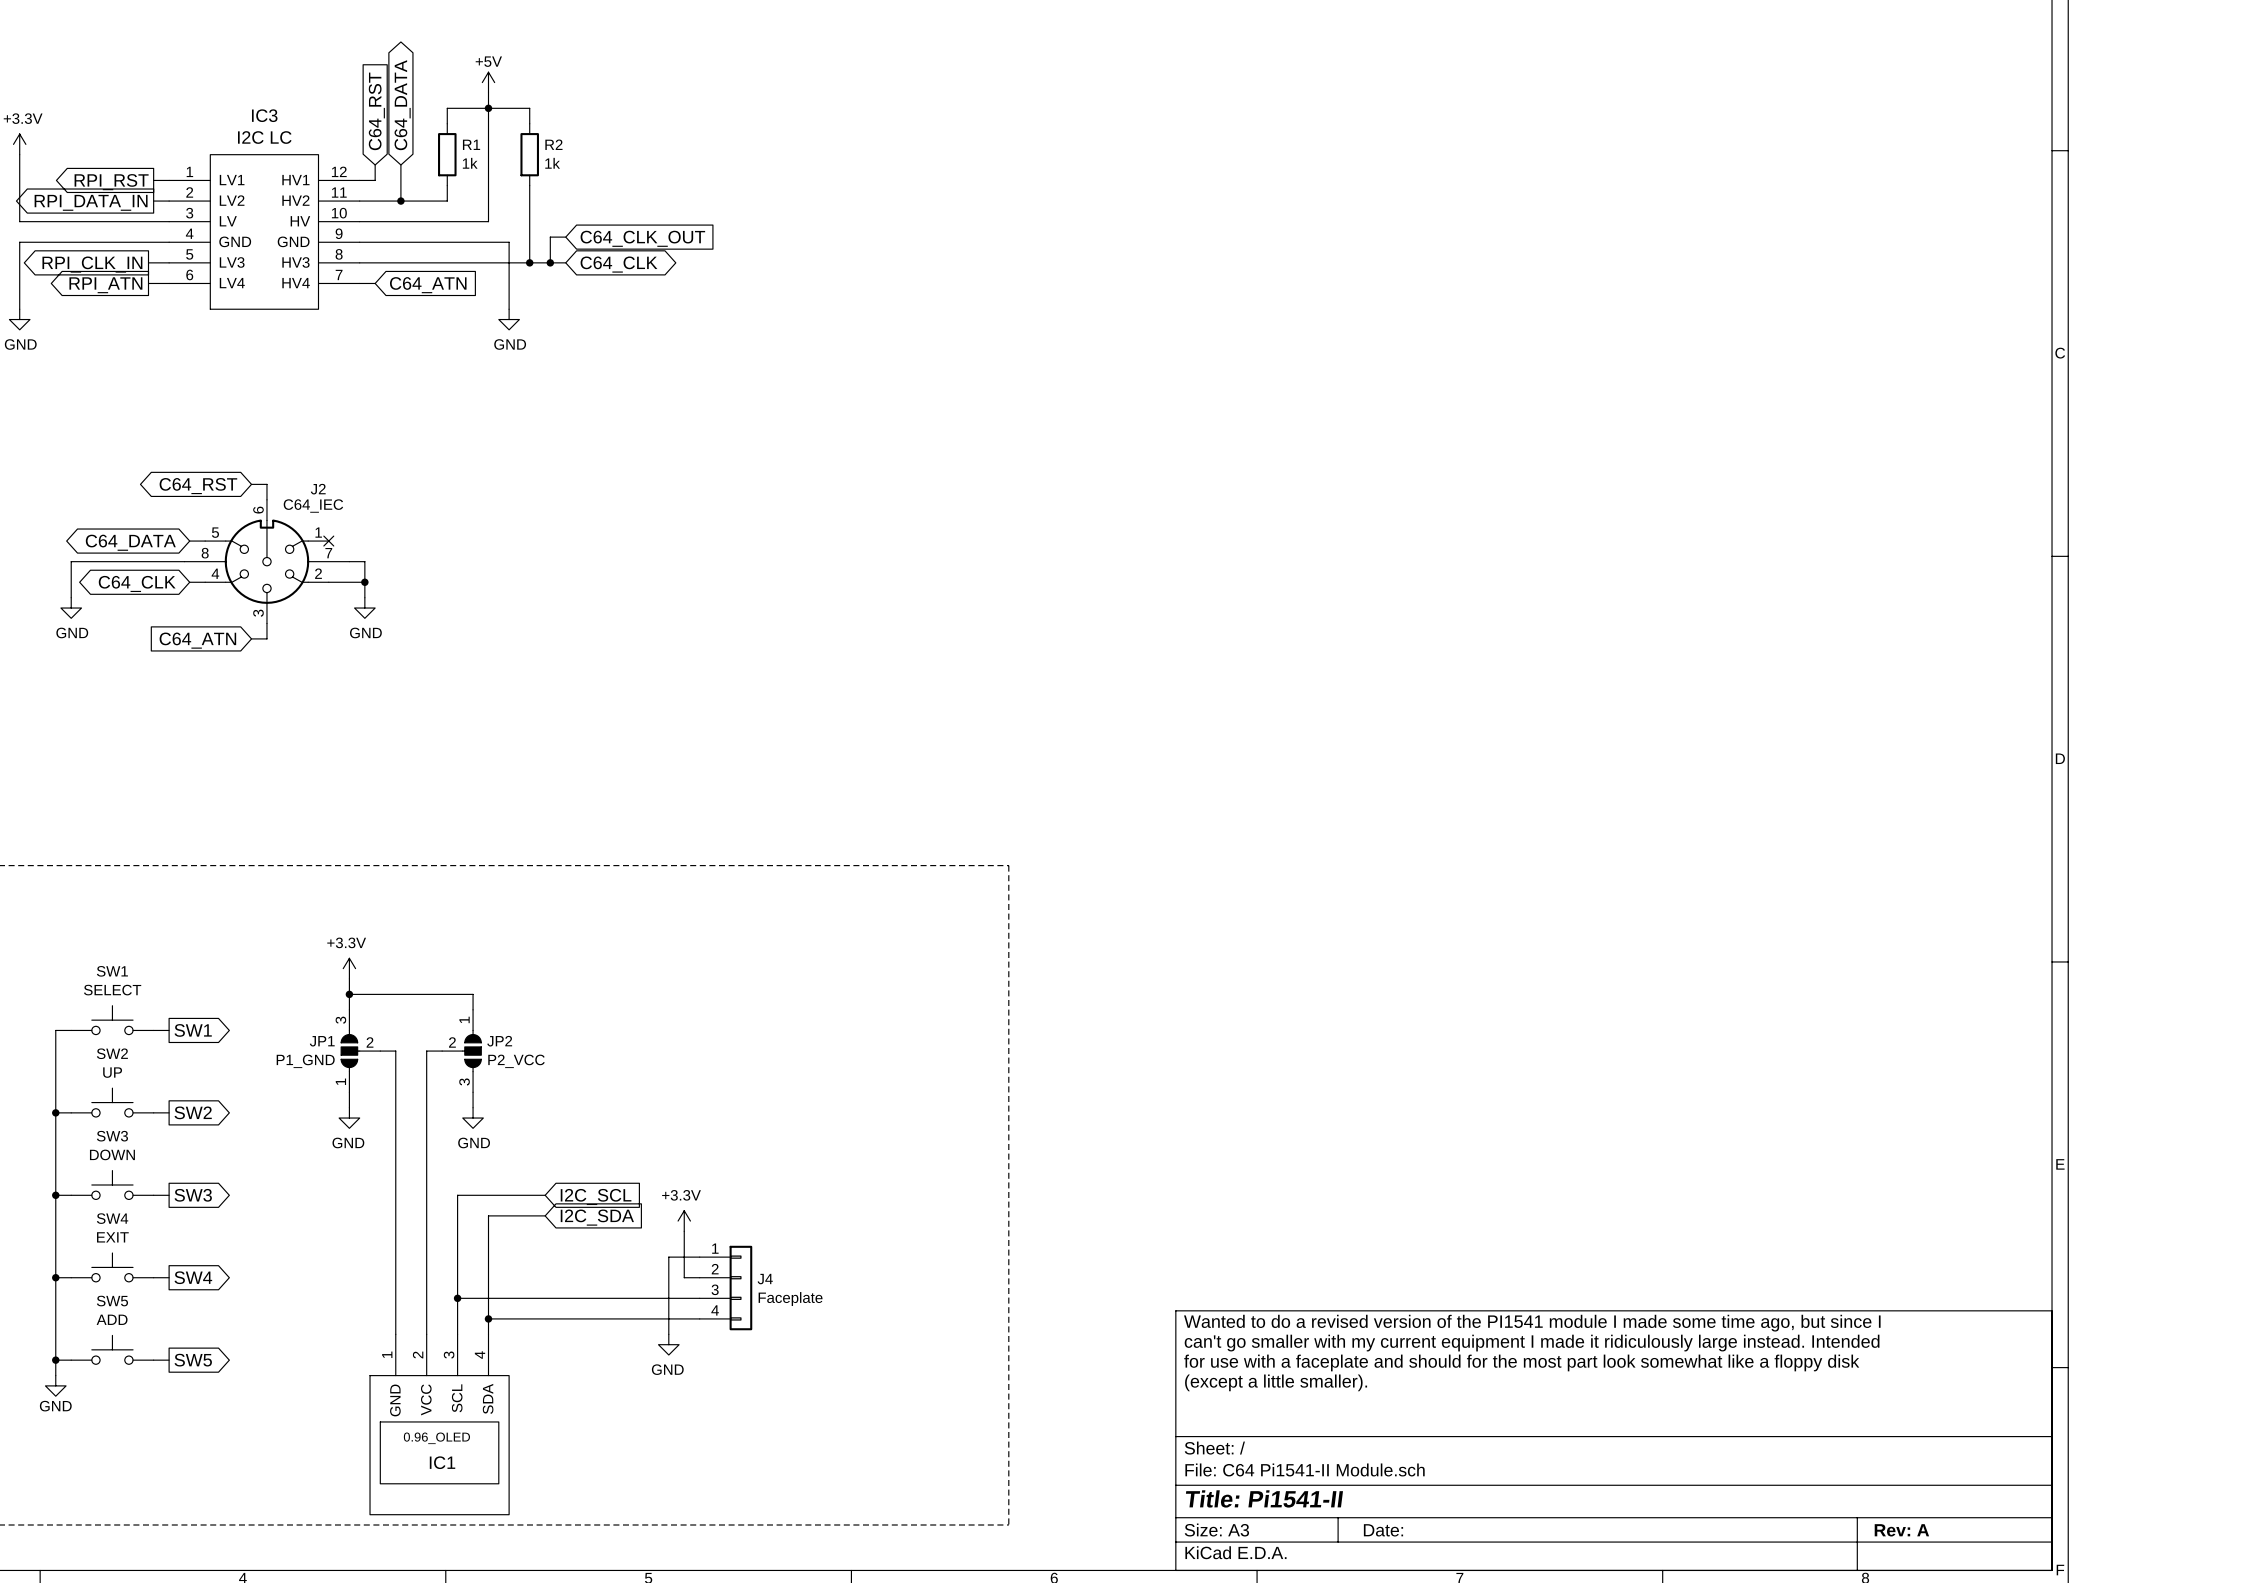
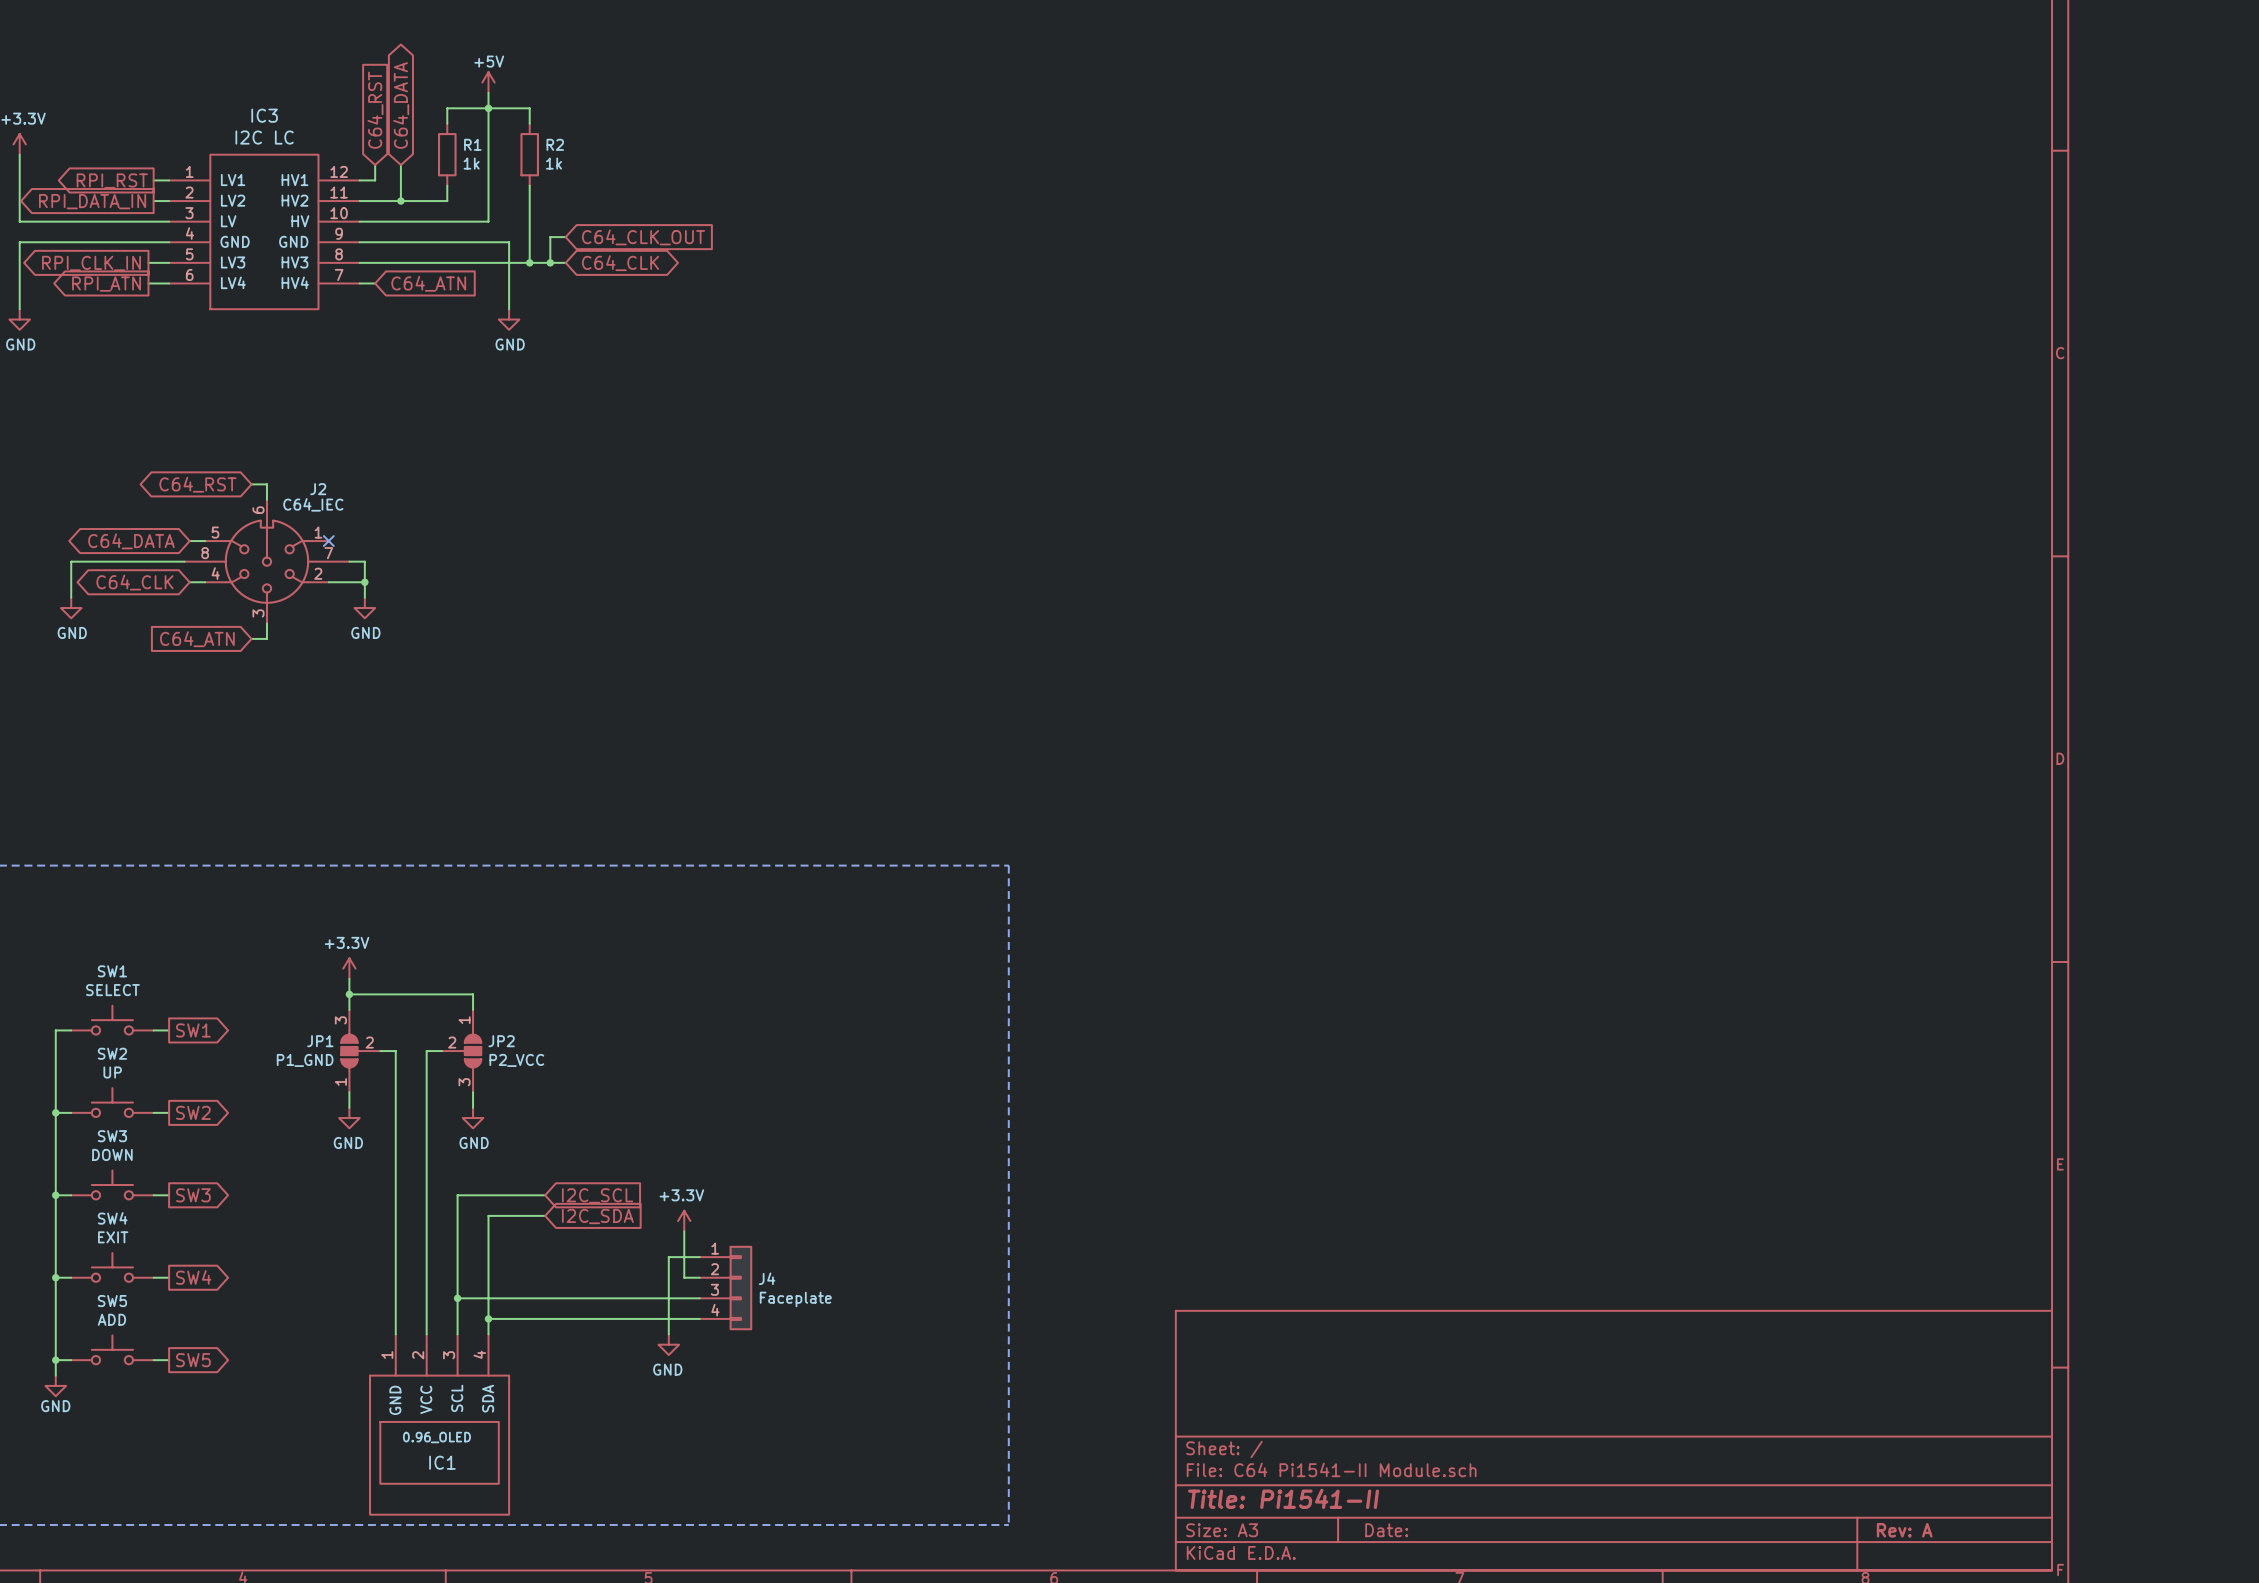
text: Wanted to do a revised version of the PI1541 module I made some time ago, but since I (1532, 1323) -> none
text: can't go smaller with my current equipment I made it ridiculously large instead. Intended (1532, 1343) -> none
text: for use with a faceplate and should for the most part look somewhat like a floppy disk (1521, 1362) -> none
text: (except a little smaller). (1276, 1382) -> none

